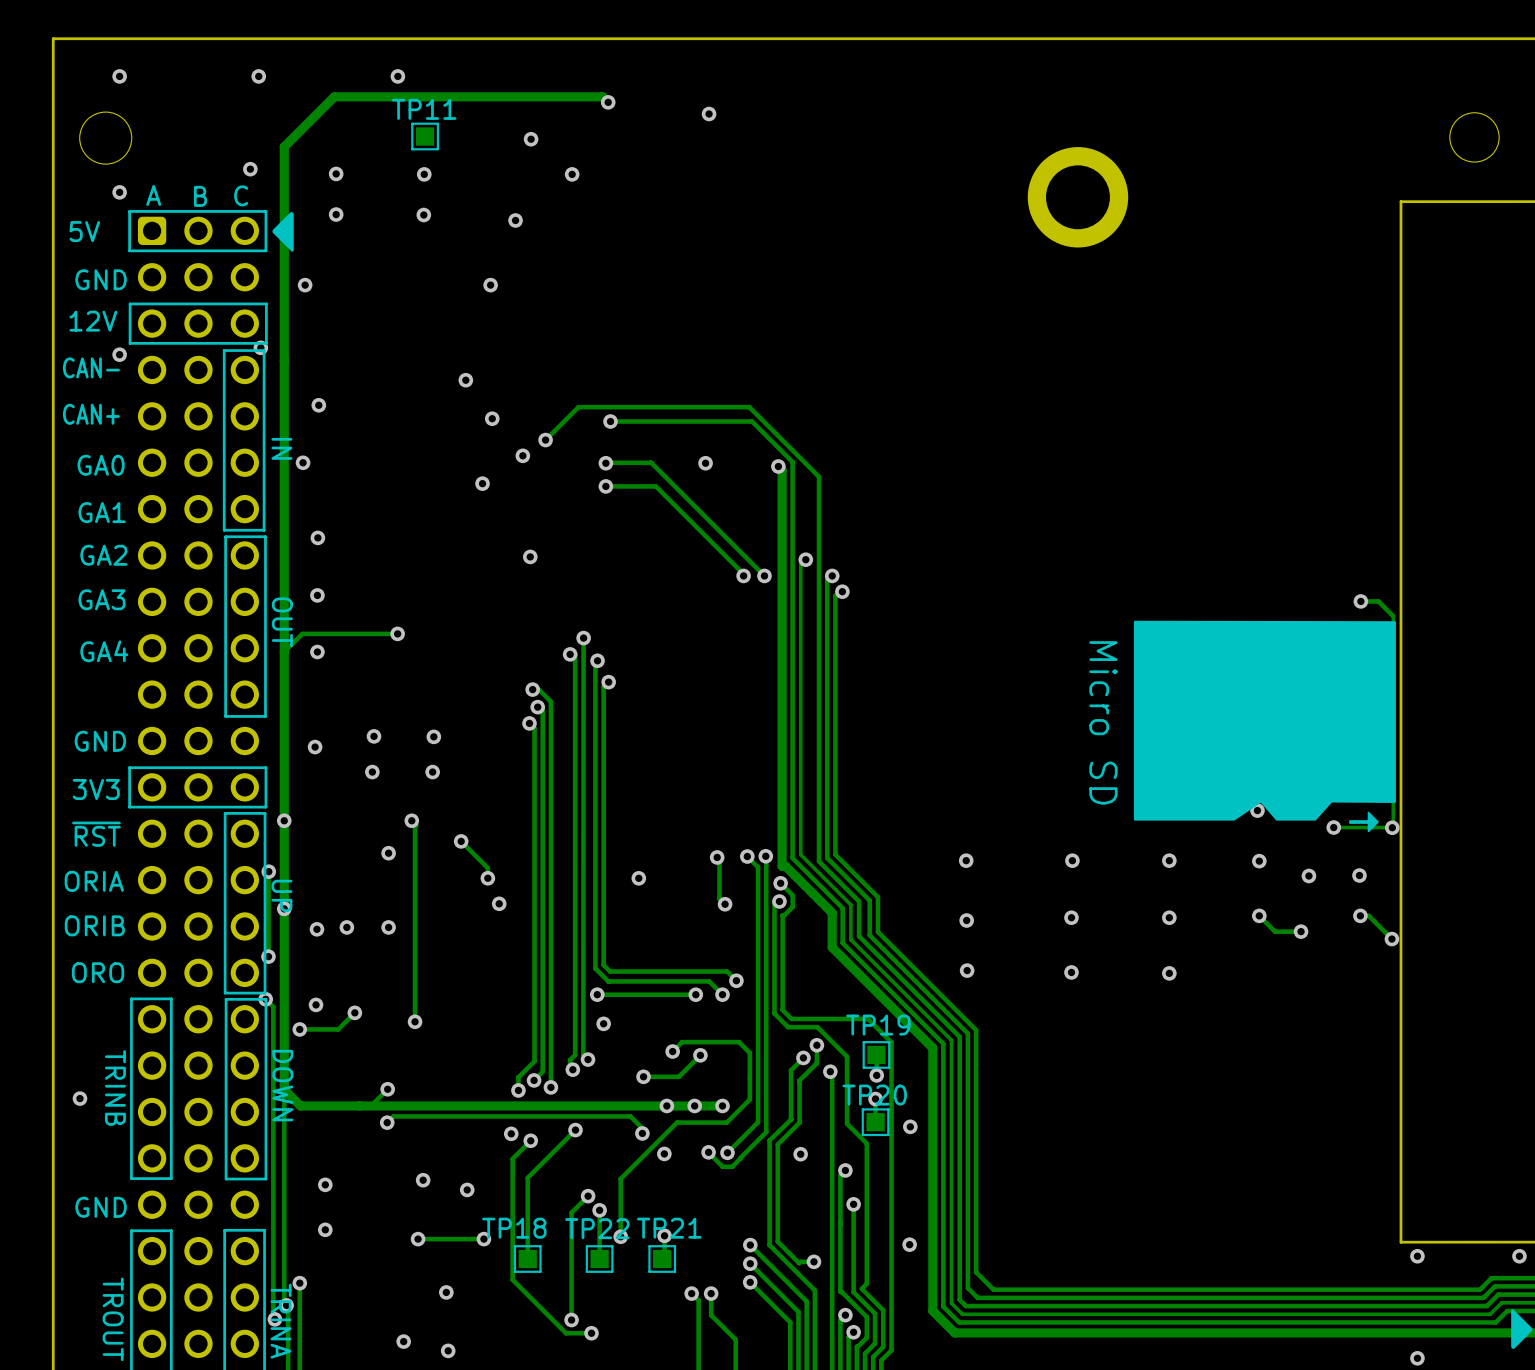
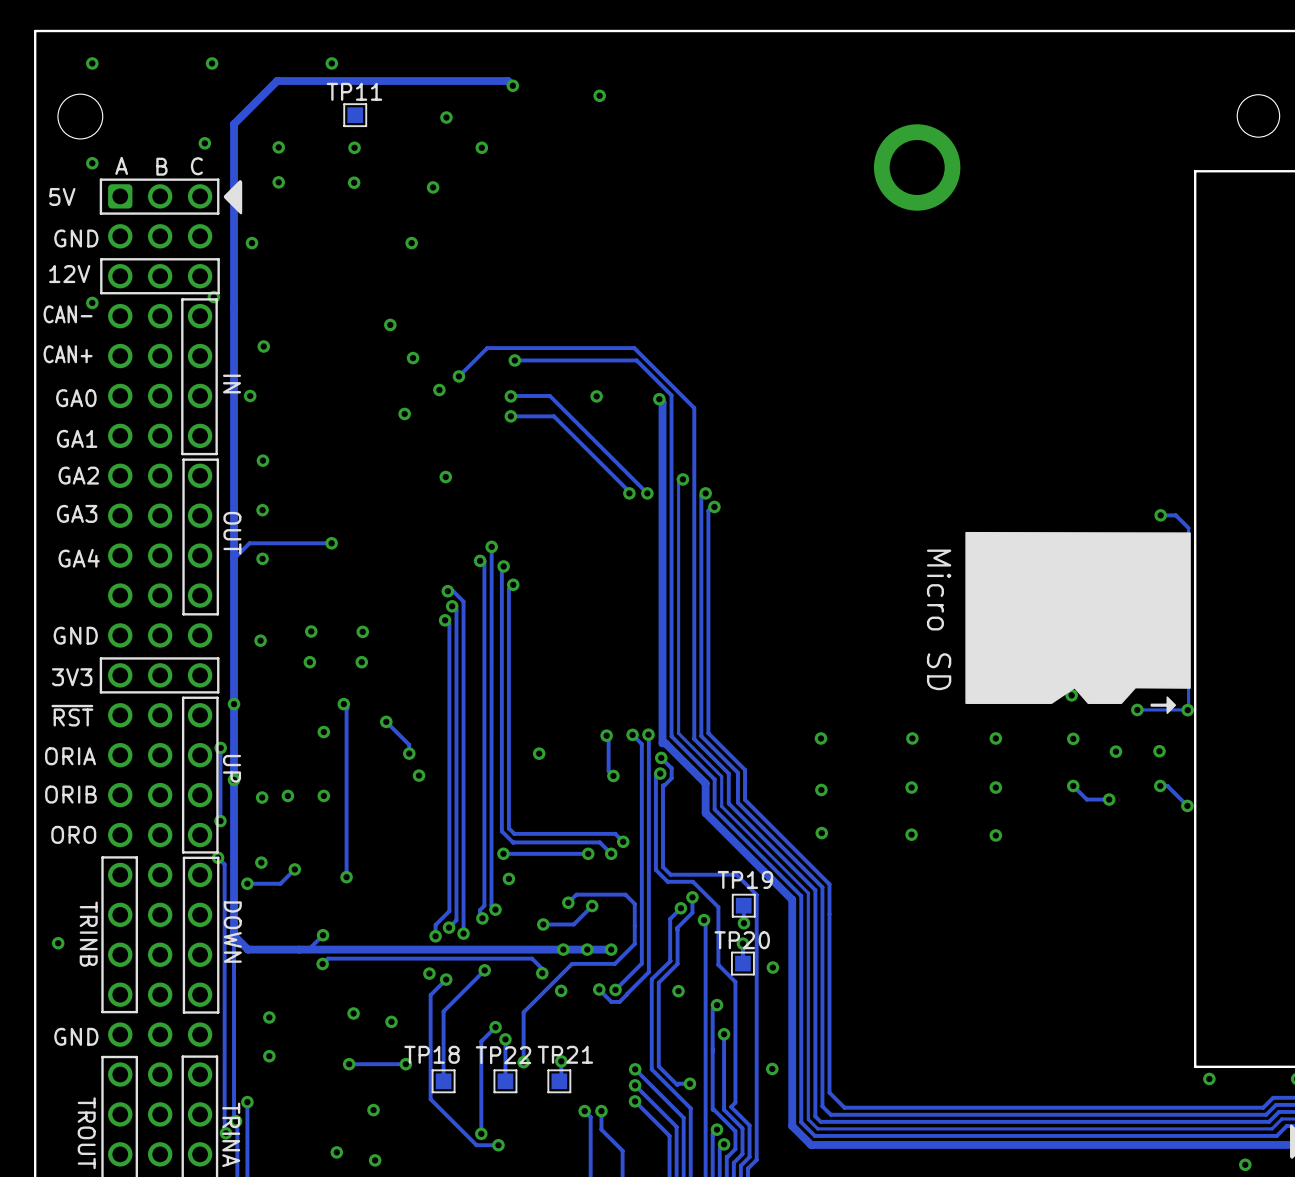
via position: (1417, 1358) -> (1245, 1164)

